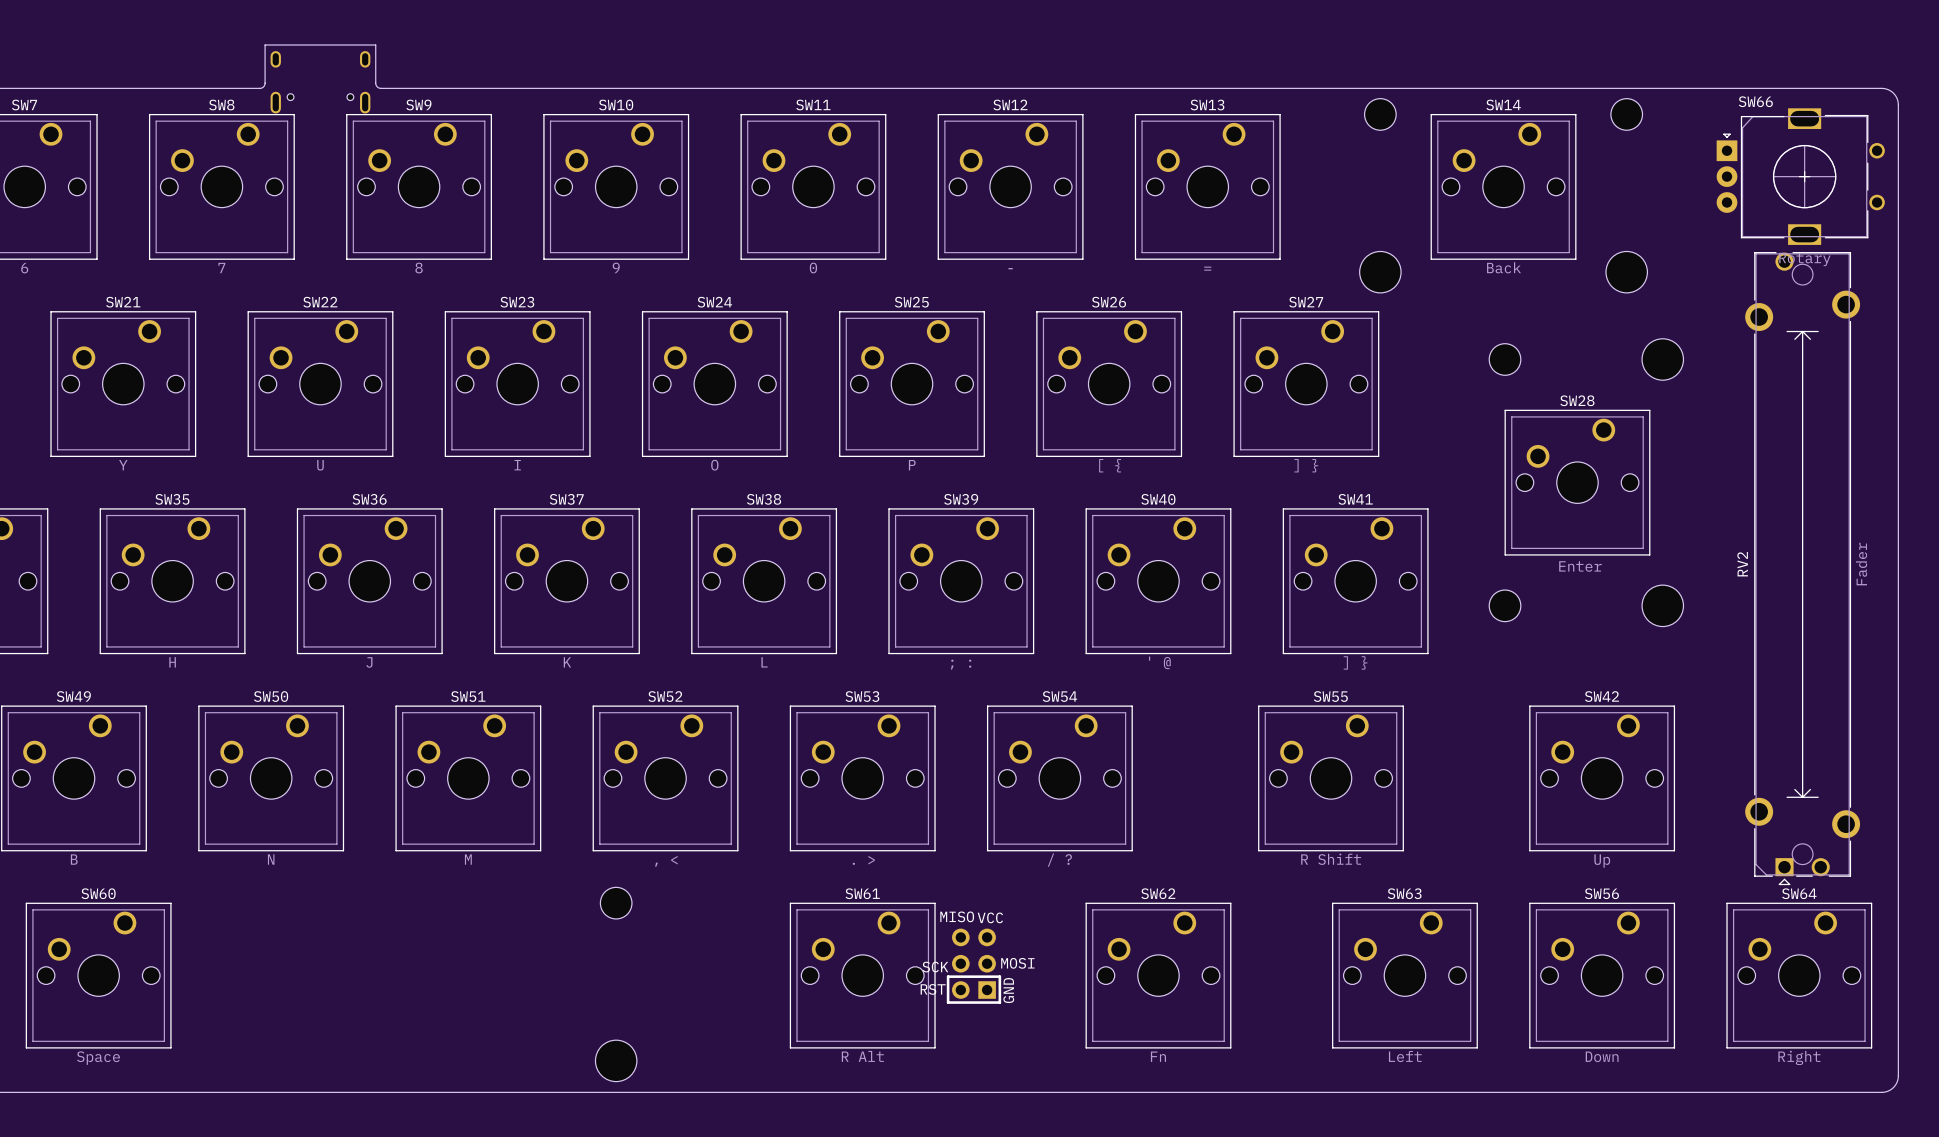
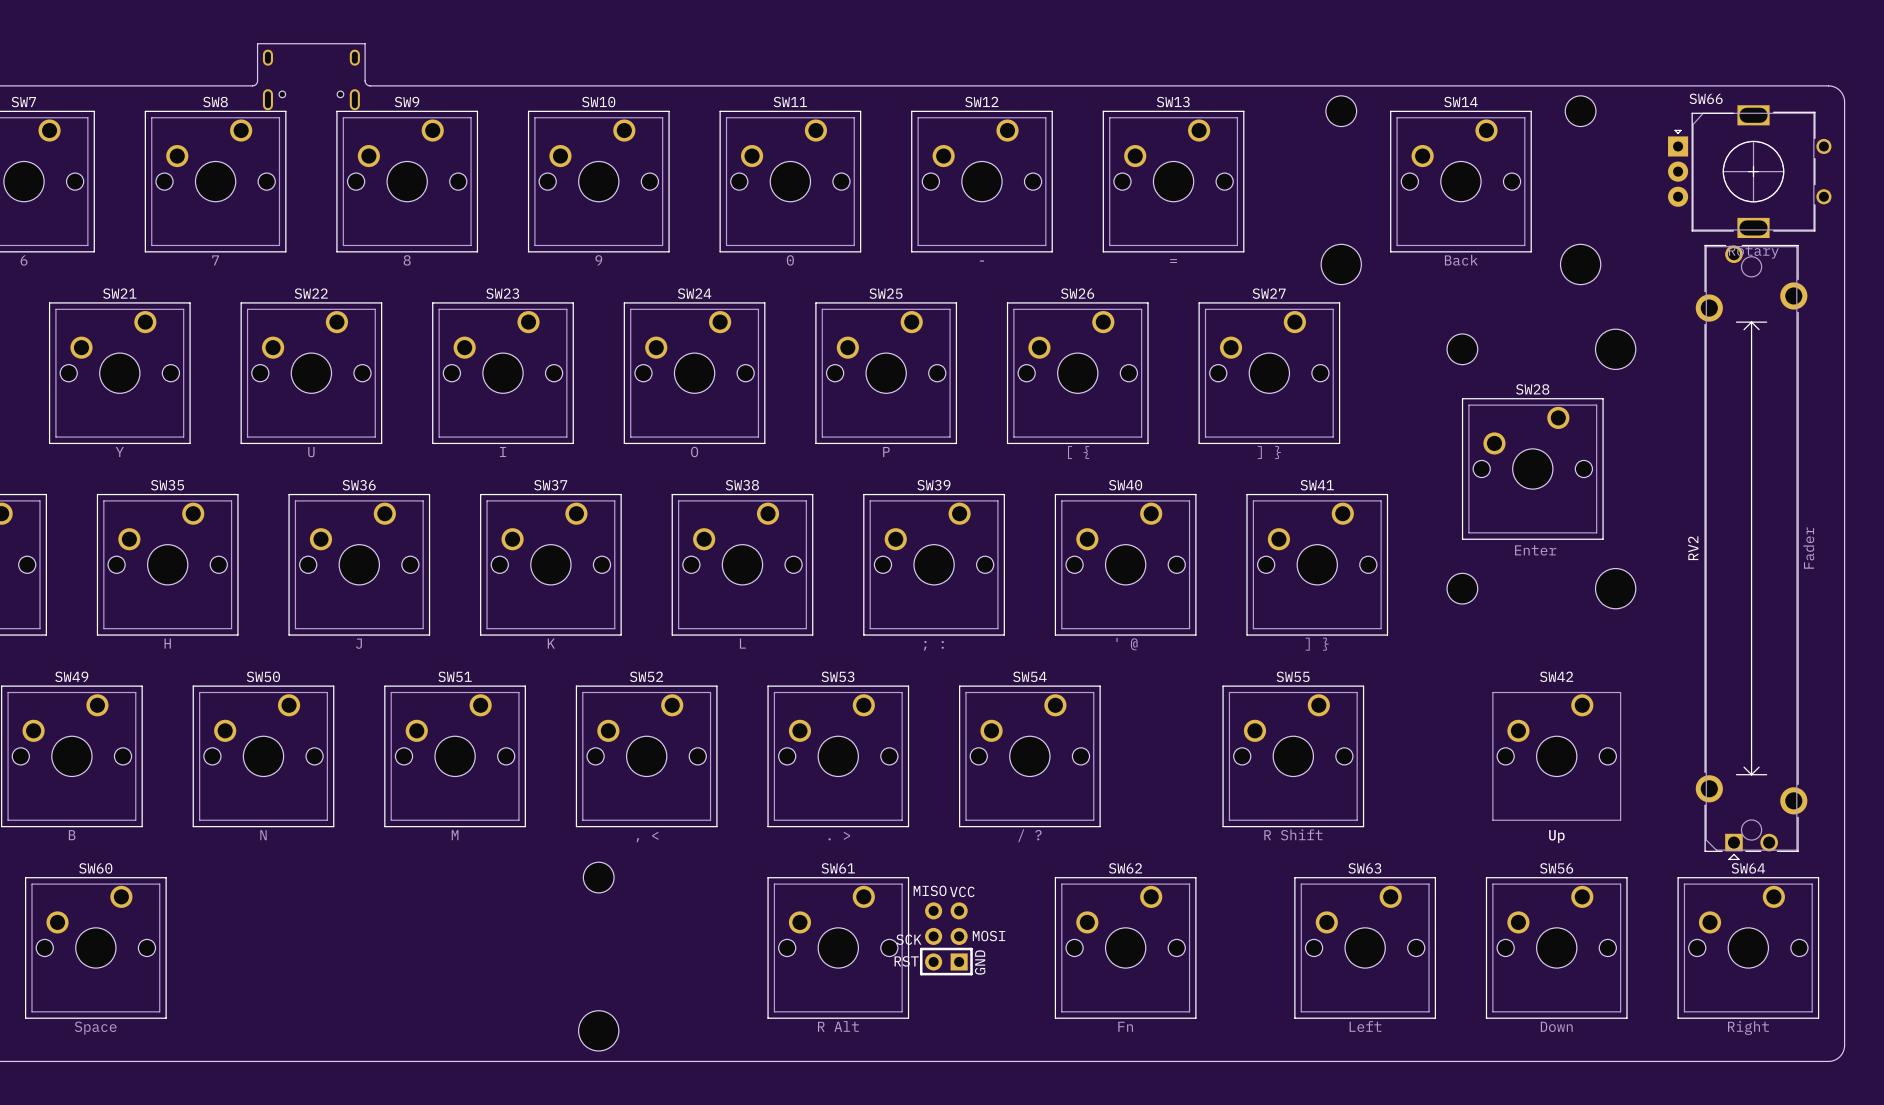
SW42 footprint: [1529, 705, 1676, 852] -> [1492, 692, 1622, 821]

